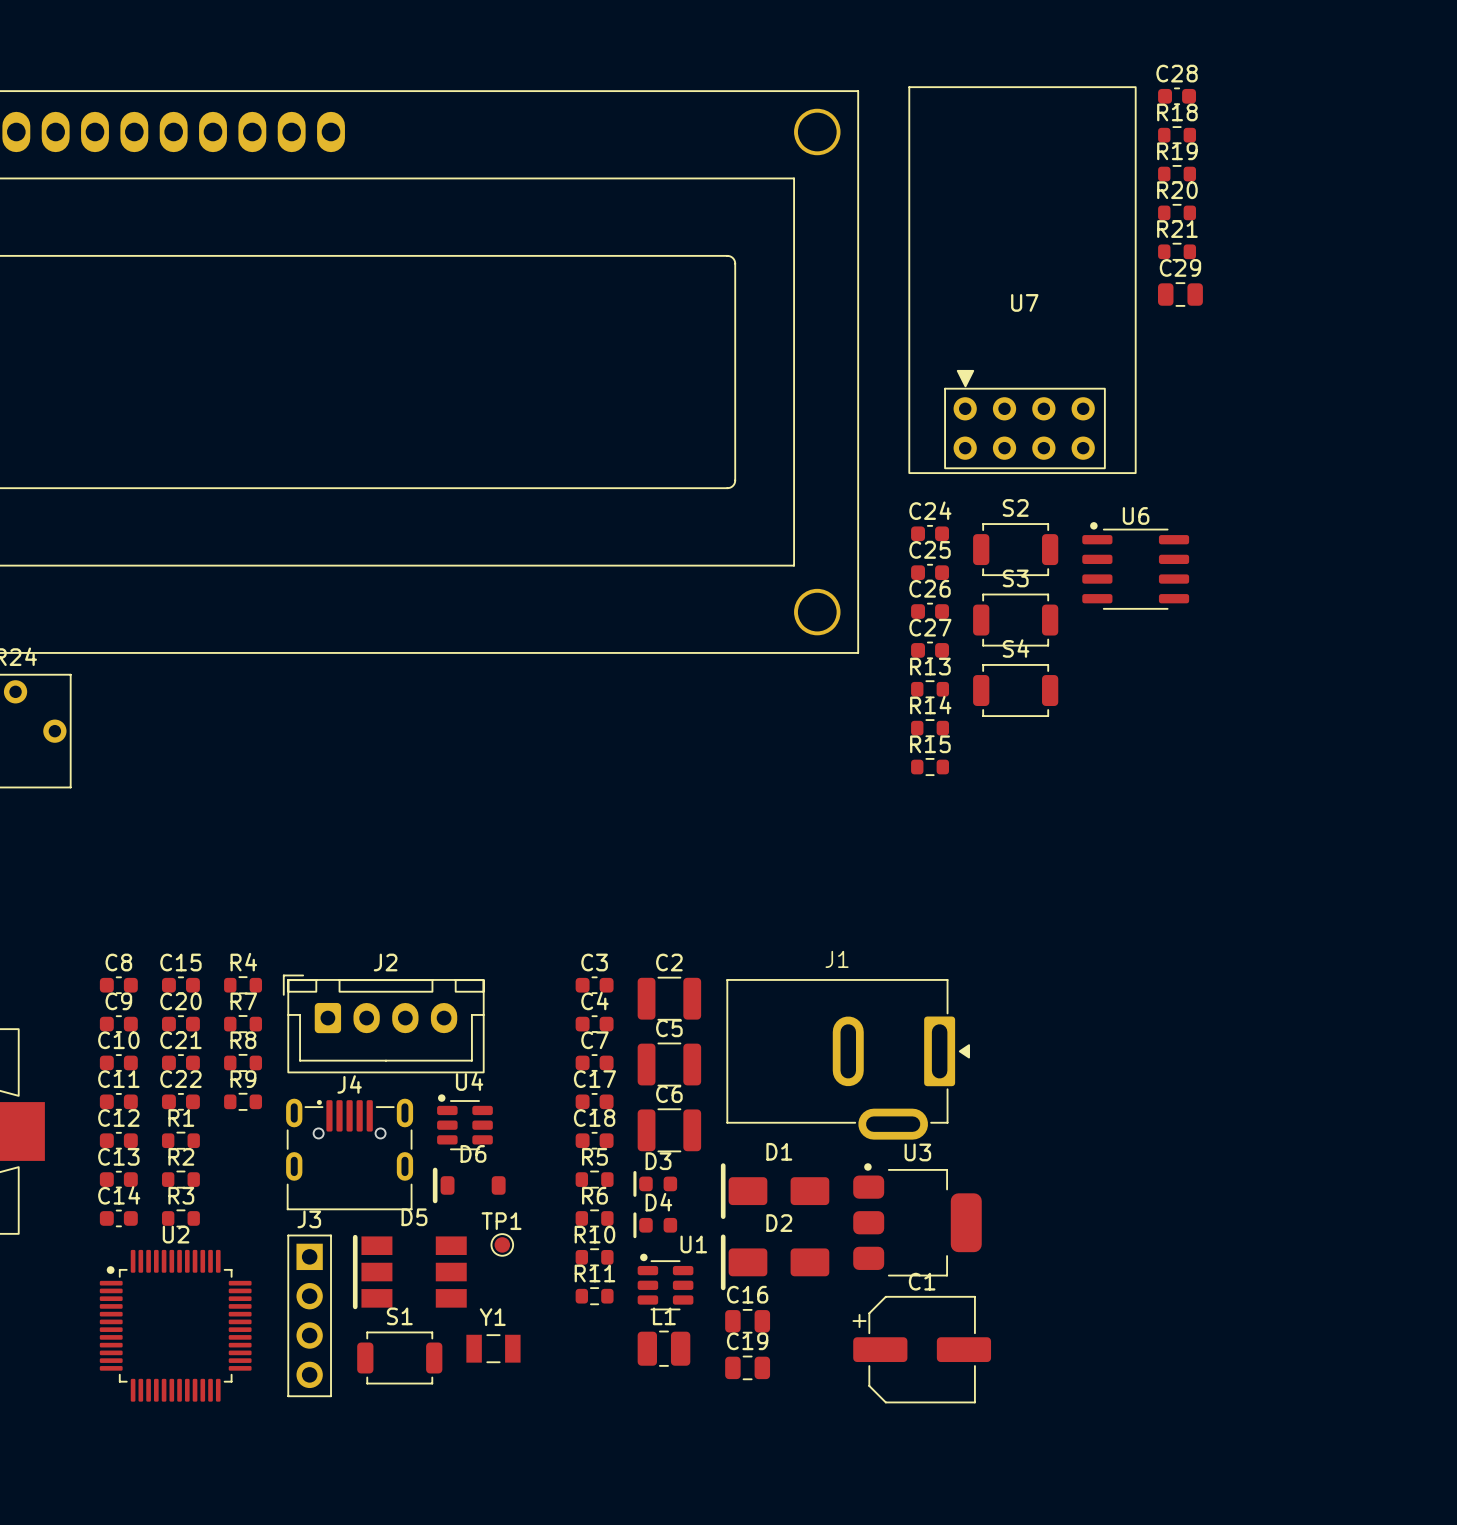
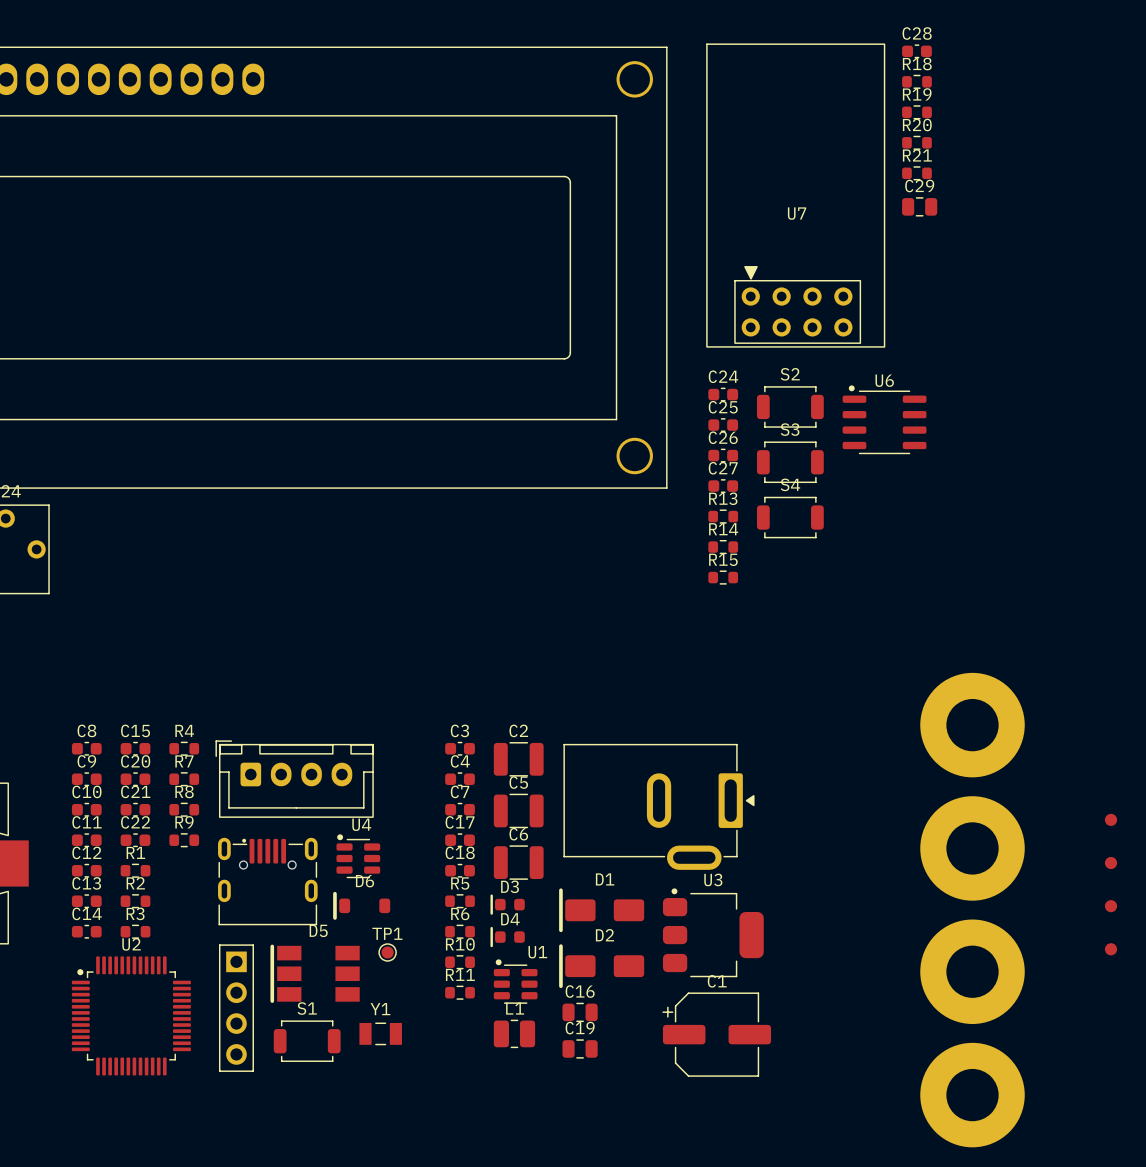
part: none -> (972, 725)
J1 name: J1 (837, 959) -> none
J2 name: J2 (385, 962) -> none
part: none -> (1111, 819)
J4 name: J4 (349, 1084) -> none
part: none -> (972, 848)
part: none -> (1111, 863)
part: none -> (1111, 906)
J3 name: J3 (309, 1219) -> none
part: none -> (1111, 949)
part: none -> (972, 971)
part: none -> (972, 1095)

